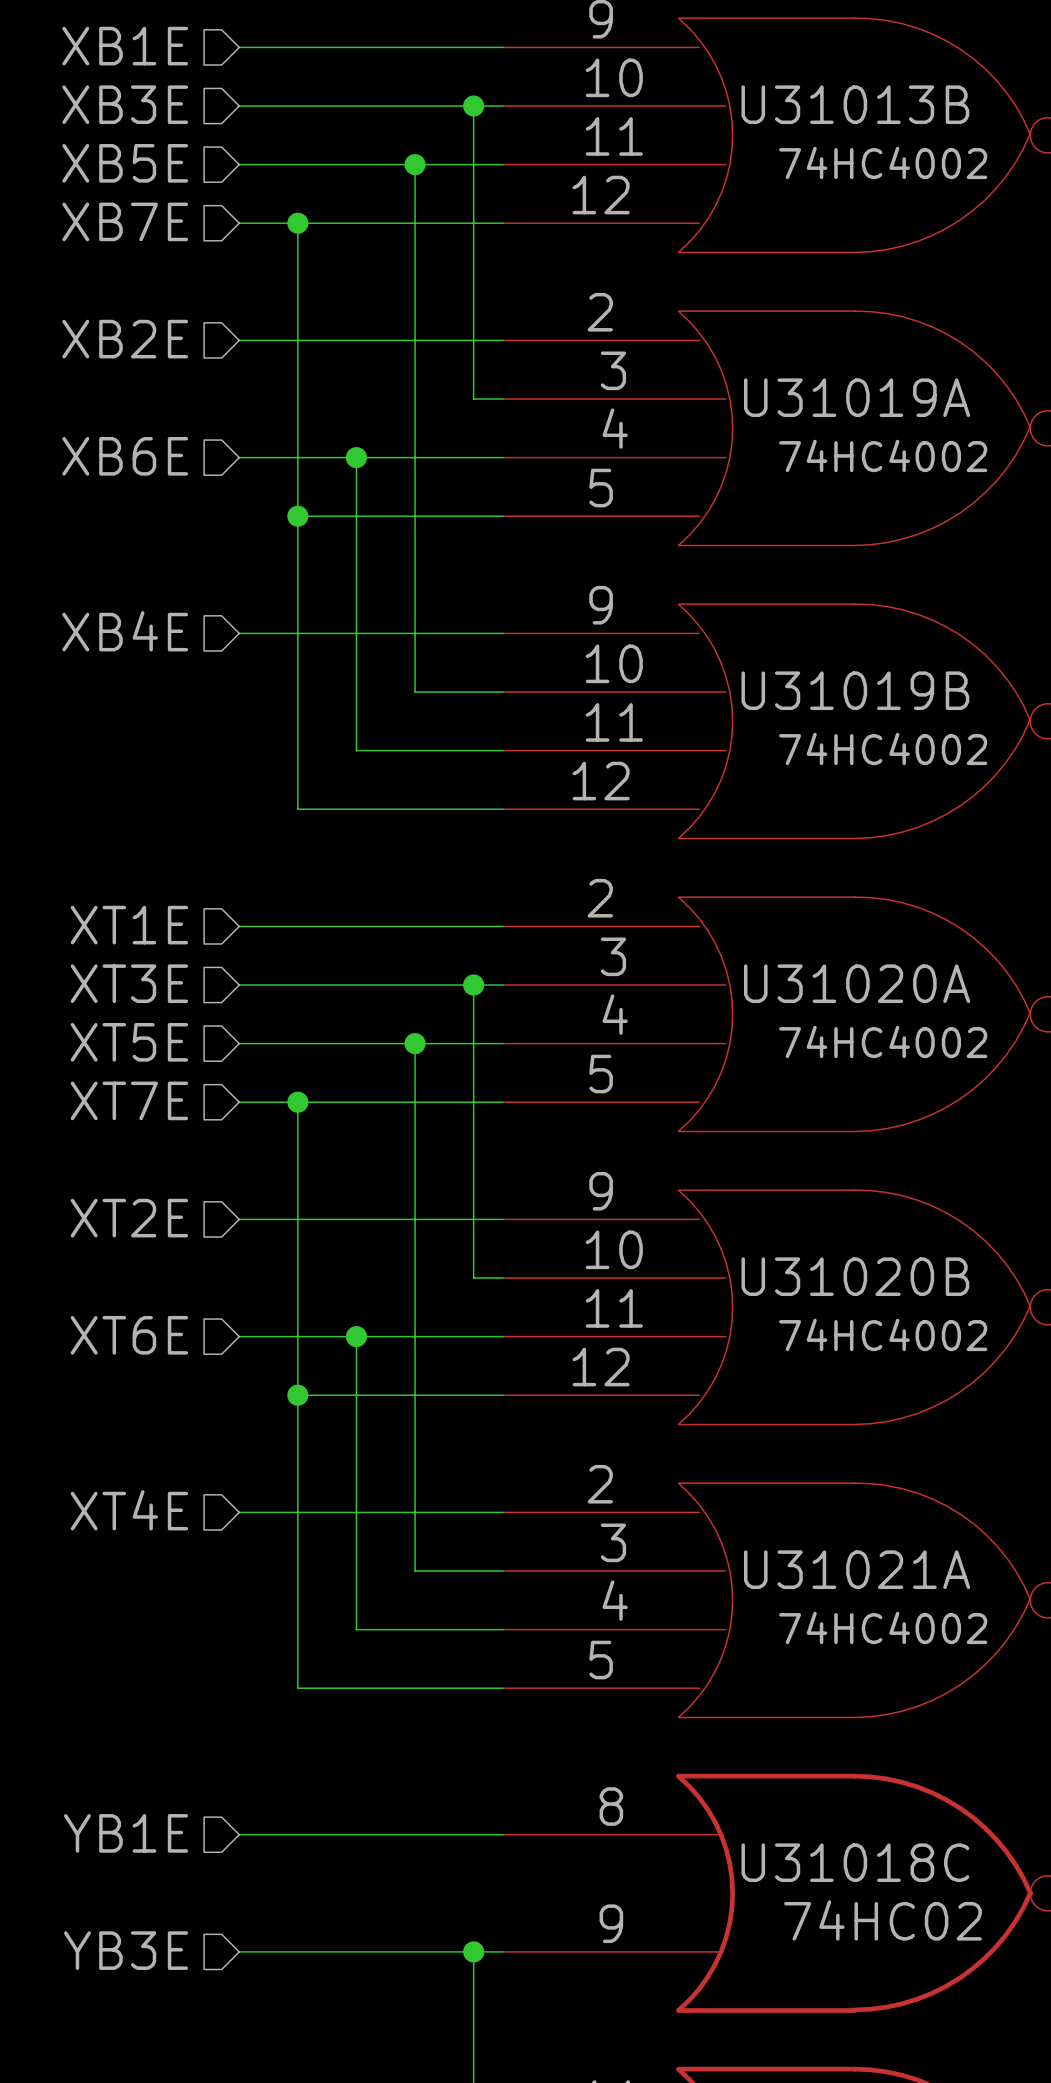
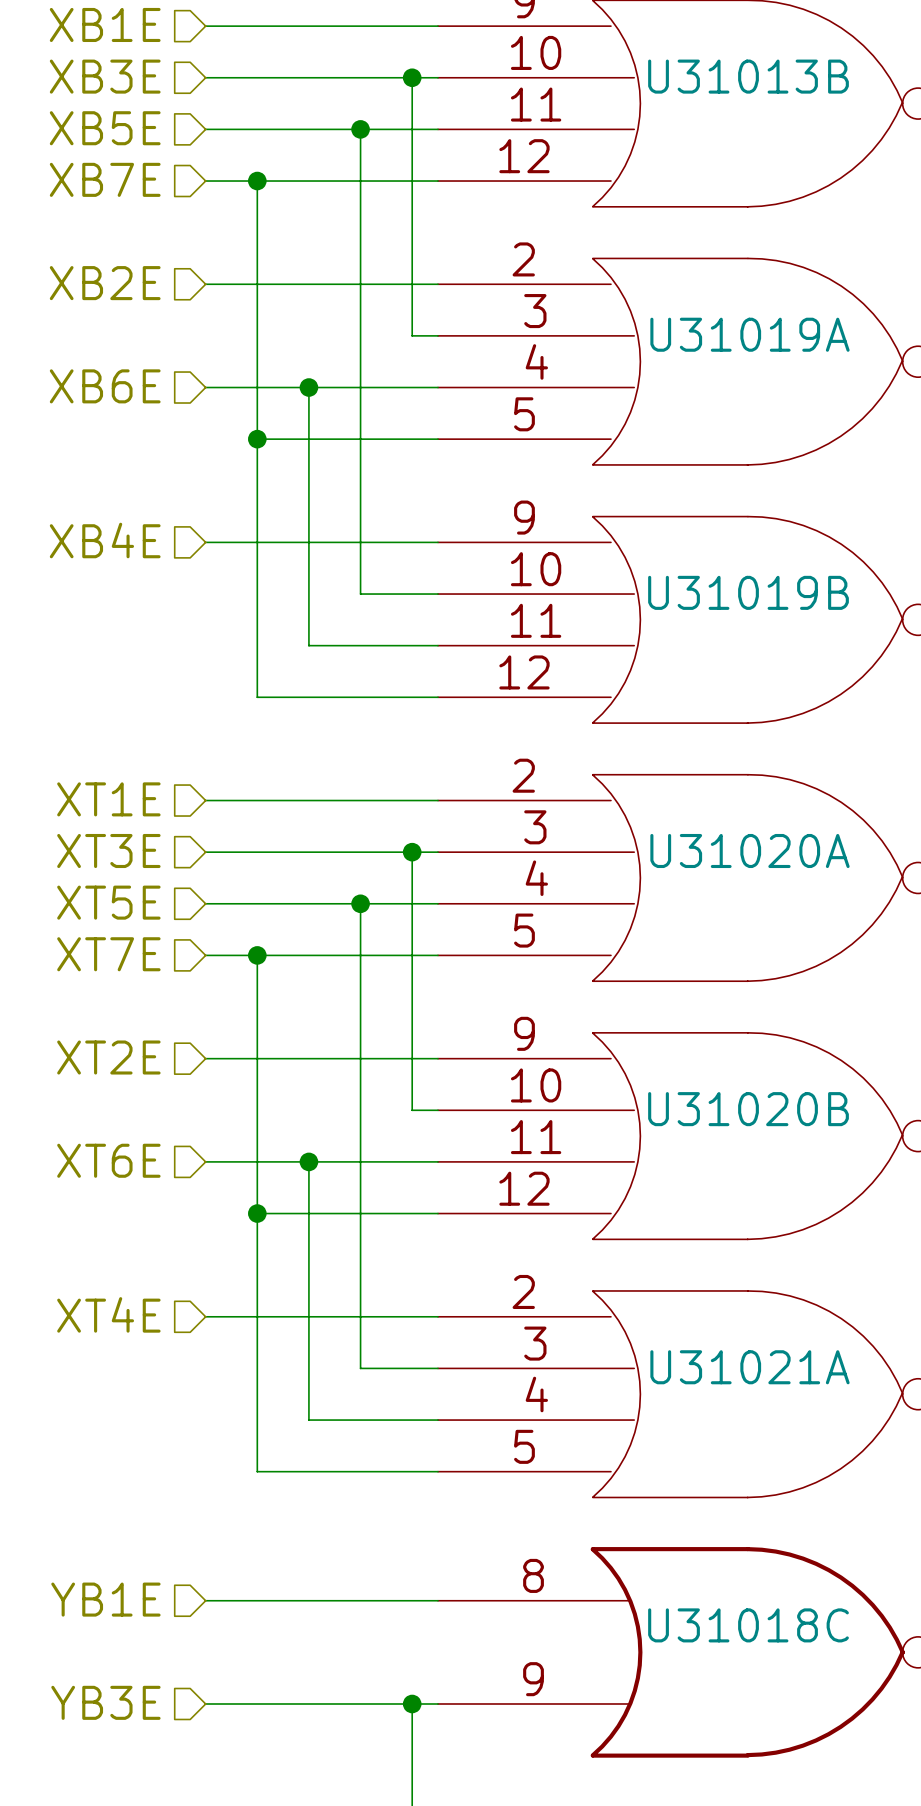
U31013B value: 74HC4002 (883, 162) -> none
U31019A value: 74HC4002 (883, 455) -> none
U31019B value: 74HC4002 (883, 748) -> none
U31020A value: 74HC4002 (883, 1041) -> none
U31020B value: 74HC4002 (883, 1334) -> none
U31021A value: 74HC4002 (883, 1627) -> none
U31018C value: 74HC02 (883, 1920) -> none

